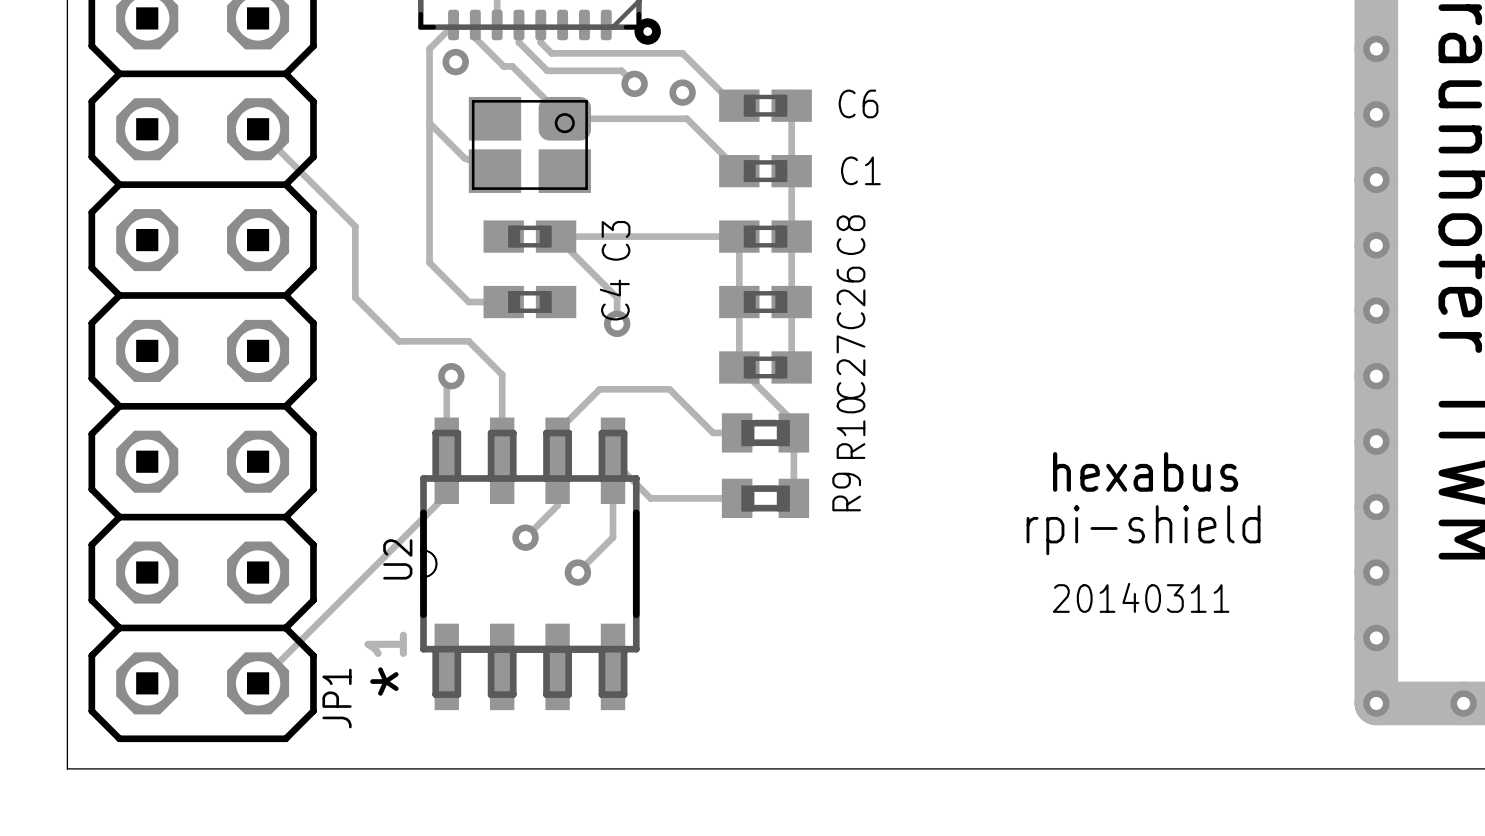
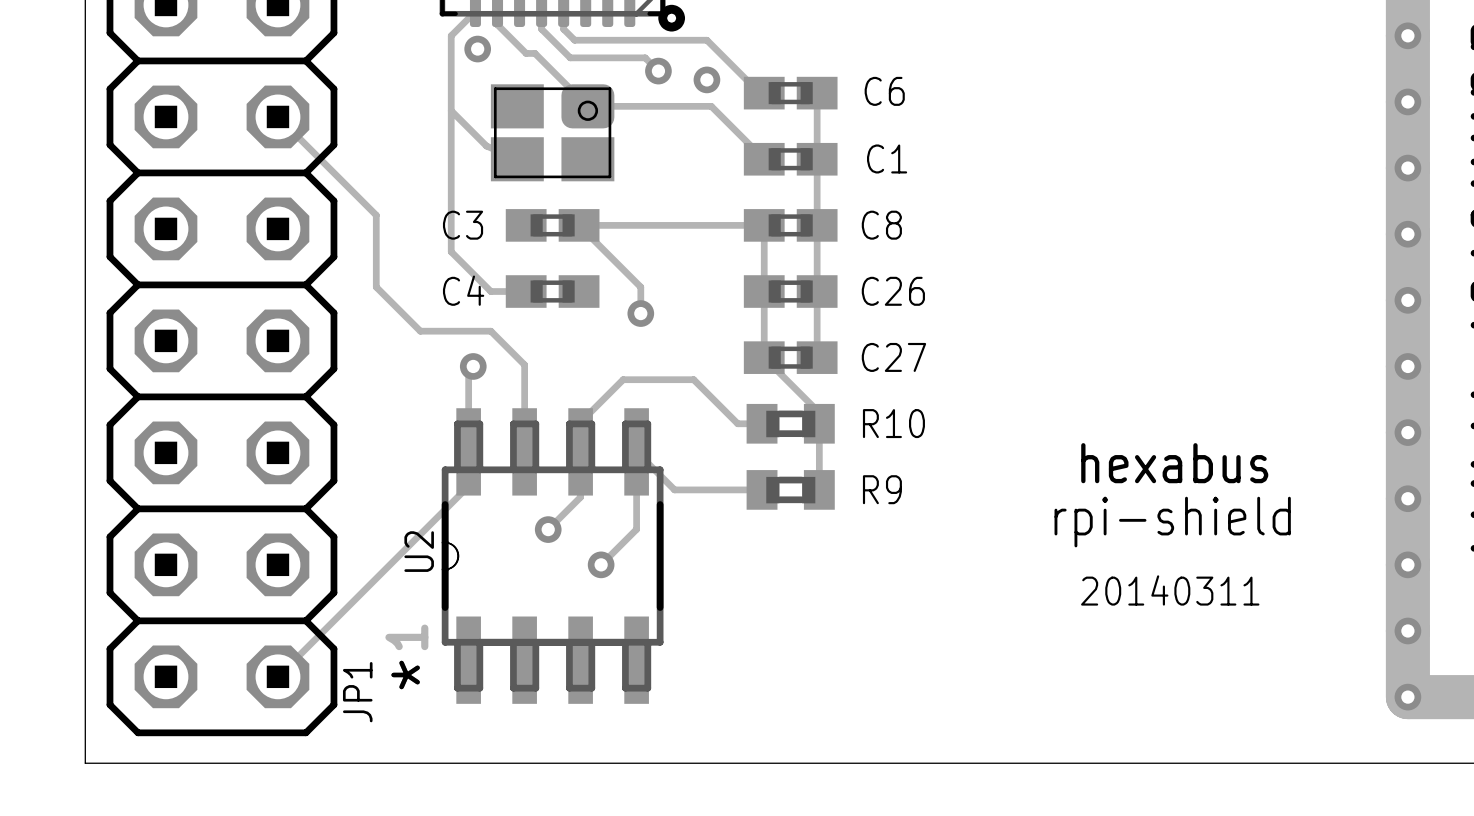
C8 name rotation: 0° (851, 235) -> 90° clockwise (881, 225)
C3 name rotation: 0° (616, 240) -> 90° clockwise (463, 225)
C3 name position: C3 (616, 240) -> C3 (463, 225)
C26 name rotation: 0° (851, 297) -> 90° clockwise (893, 291)
C4 name rotation: 0° (614, 300) -> 90° clockwise (463, 290)
C4 name position: C4 (614, 300) -> C4 (463, 290)
C27 name rotation: 0° (851, 367) -> 90° clockwise (893, 357)
R10 name rotation: 0° (851, 428) -> 90° clockwise (893, 423)
R9 name rotation: 0° (846, 492) -> 90° clockwise (882, 489)

